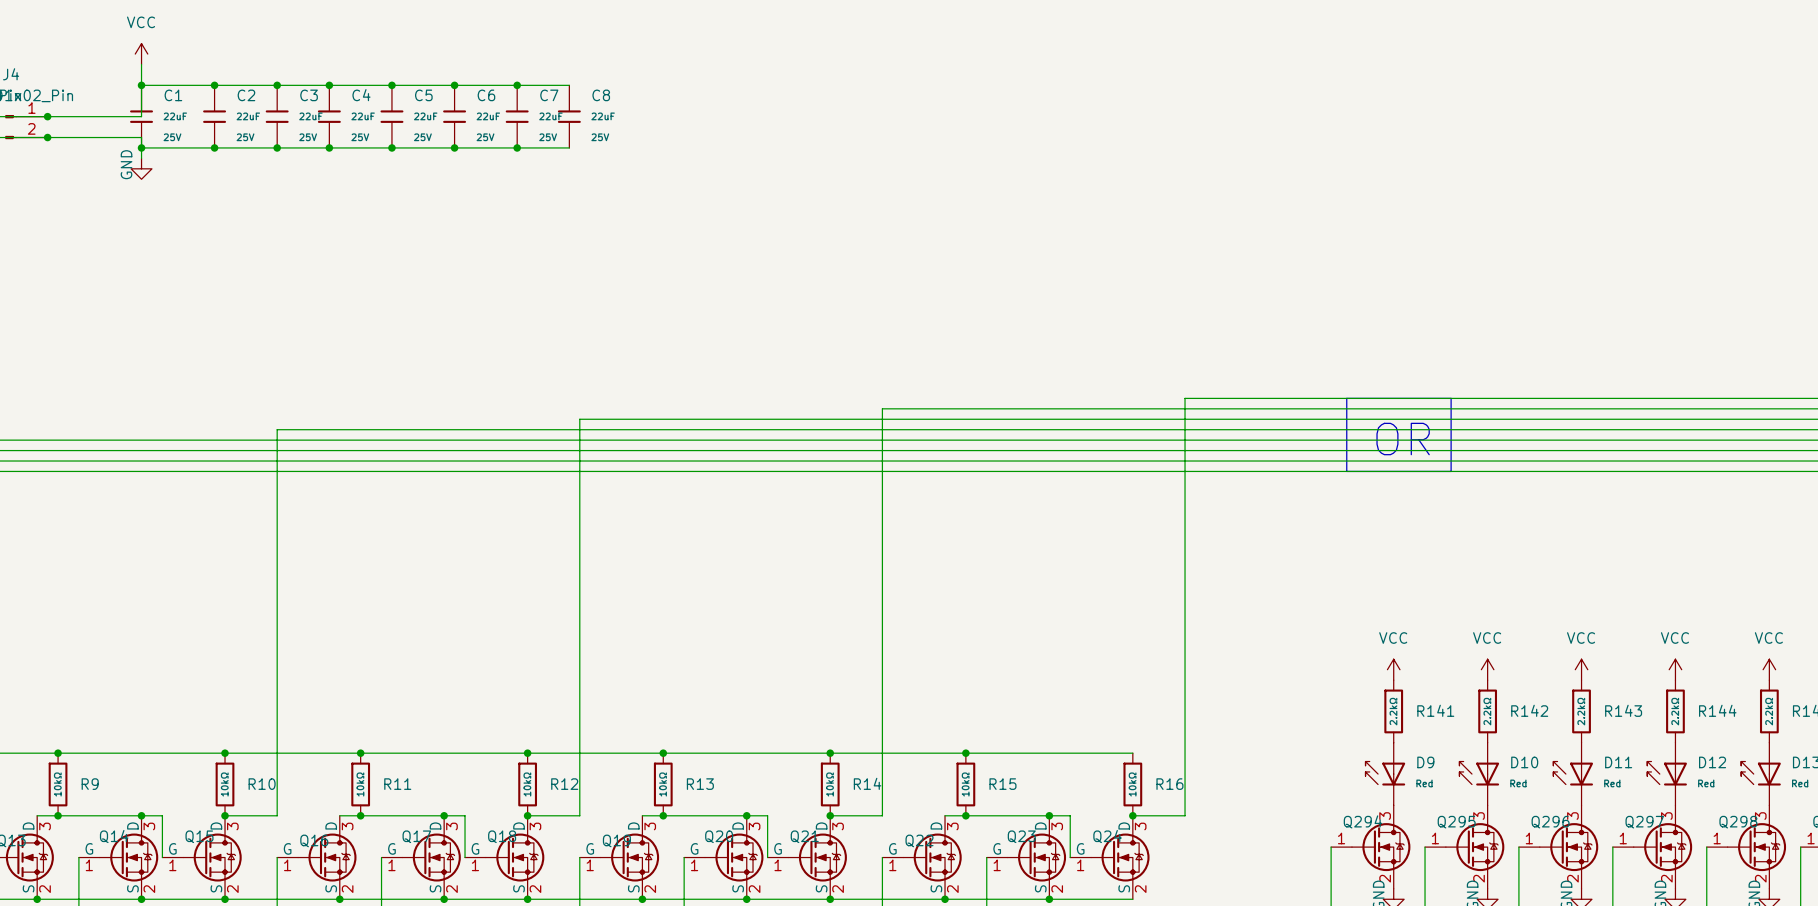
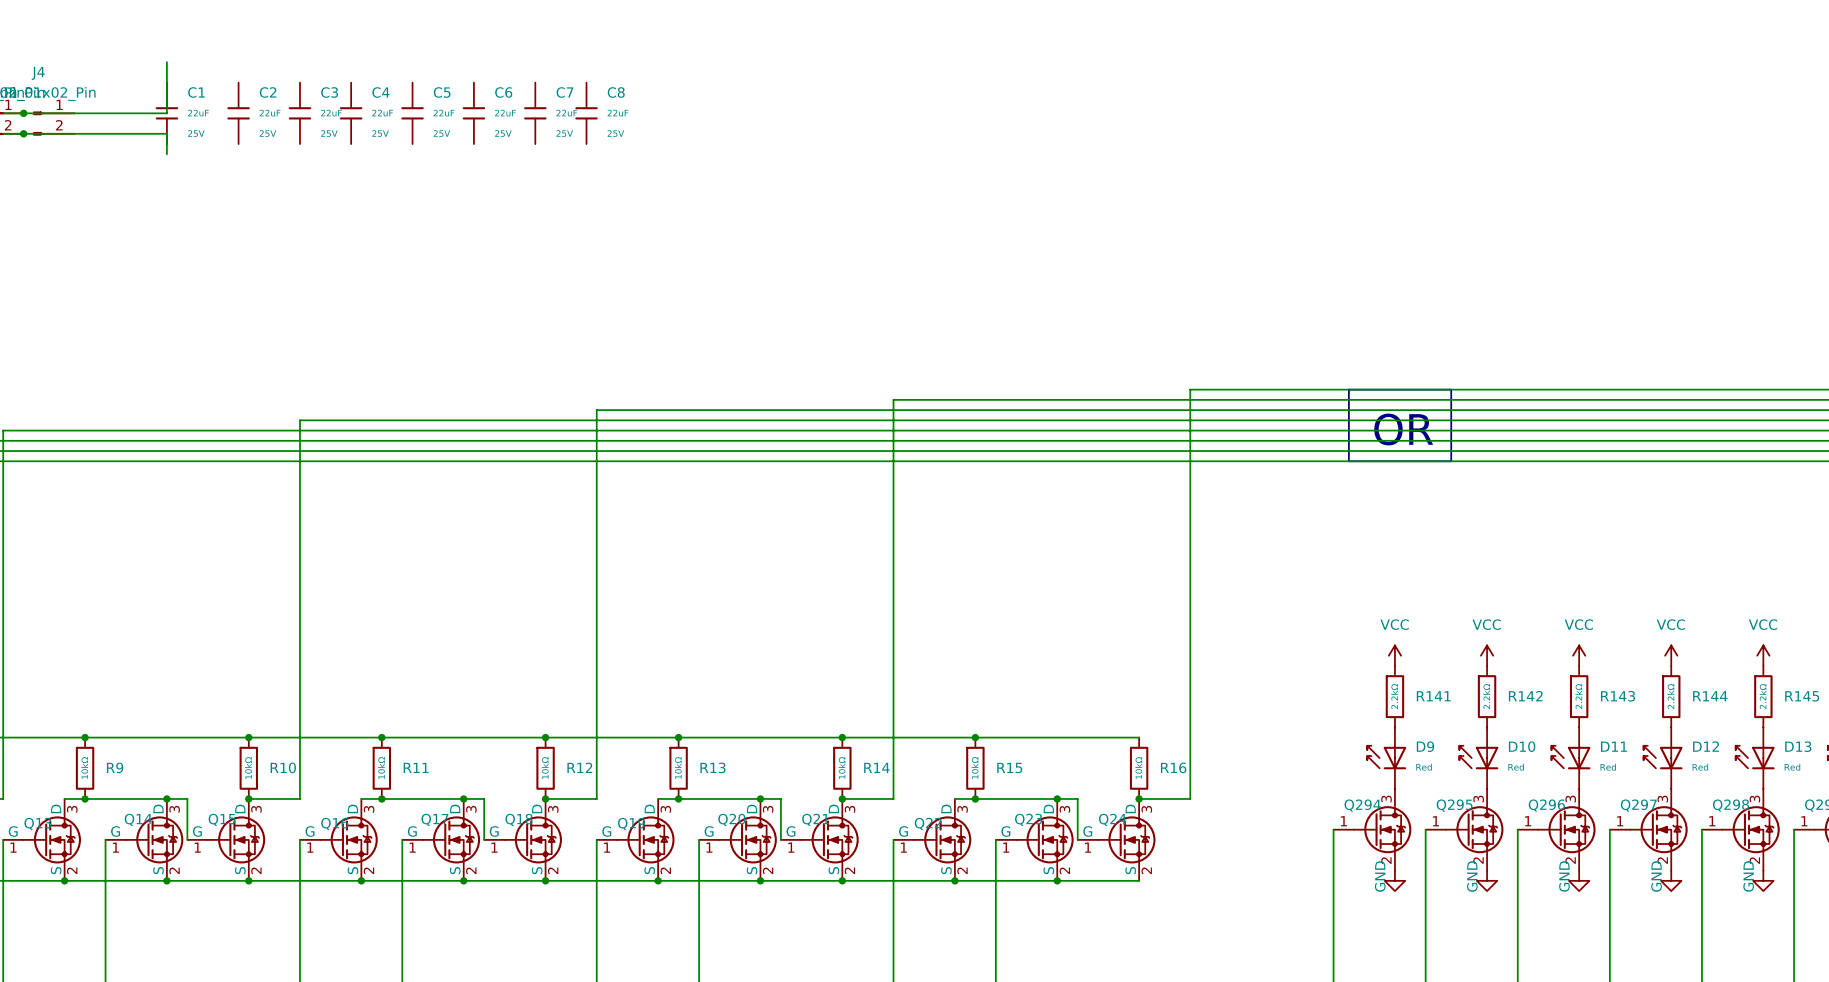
power symbol: VCC (141, 54) -> none
wire: (141, 85) (569, 85) -> none
junction: (141, 85) -> none
junction: (214, 85) -> none
junction: (277, 85) -> none
junction: (329, 85) -> none
junction: (391, 85) -> none
junction: (454, 85) -> none
junction: (517, 85) -> none
junction: (47, 116) -> none
junction: (47, 137) -> none
wire: (141, 147) (569, 147) -> none
junction: (141, 147) -> none
junction: (214, 147) -> none
junction: (277, 147) -> none
junction: (329, 147) -> none
junction: (391, 147) -> none
junction: (454, 147) -> none
junction: (517, 147) -> none
power symbol: GND (141, 168) -> none

